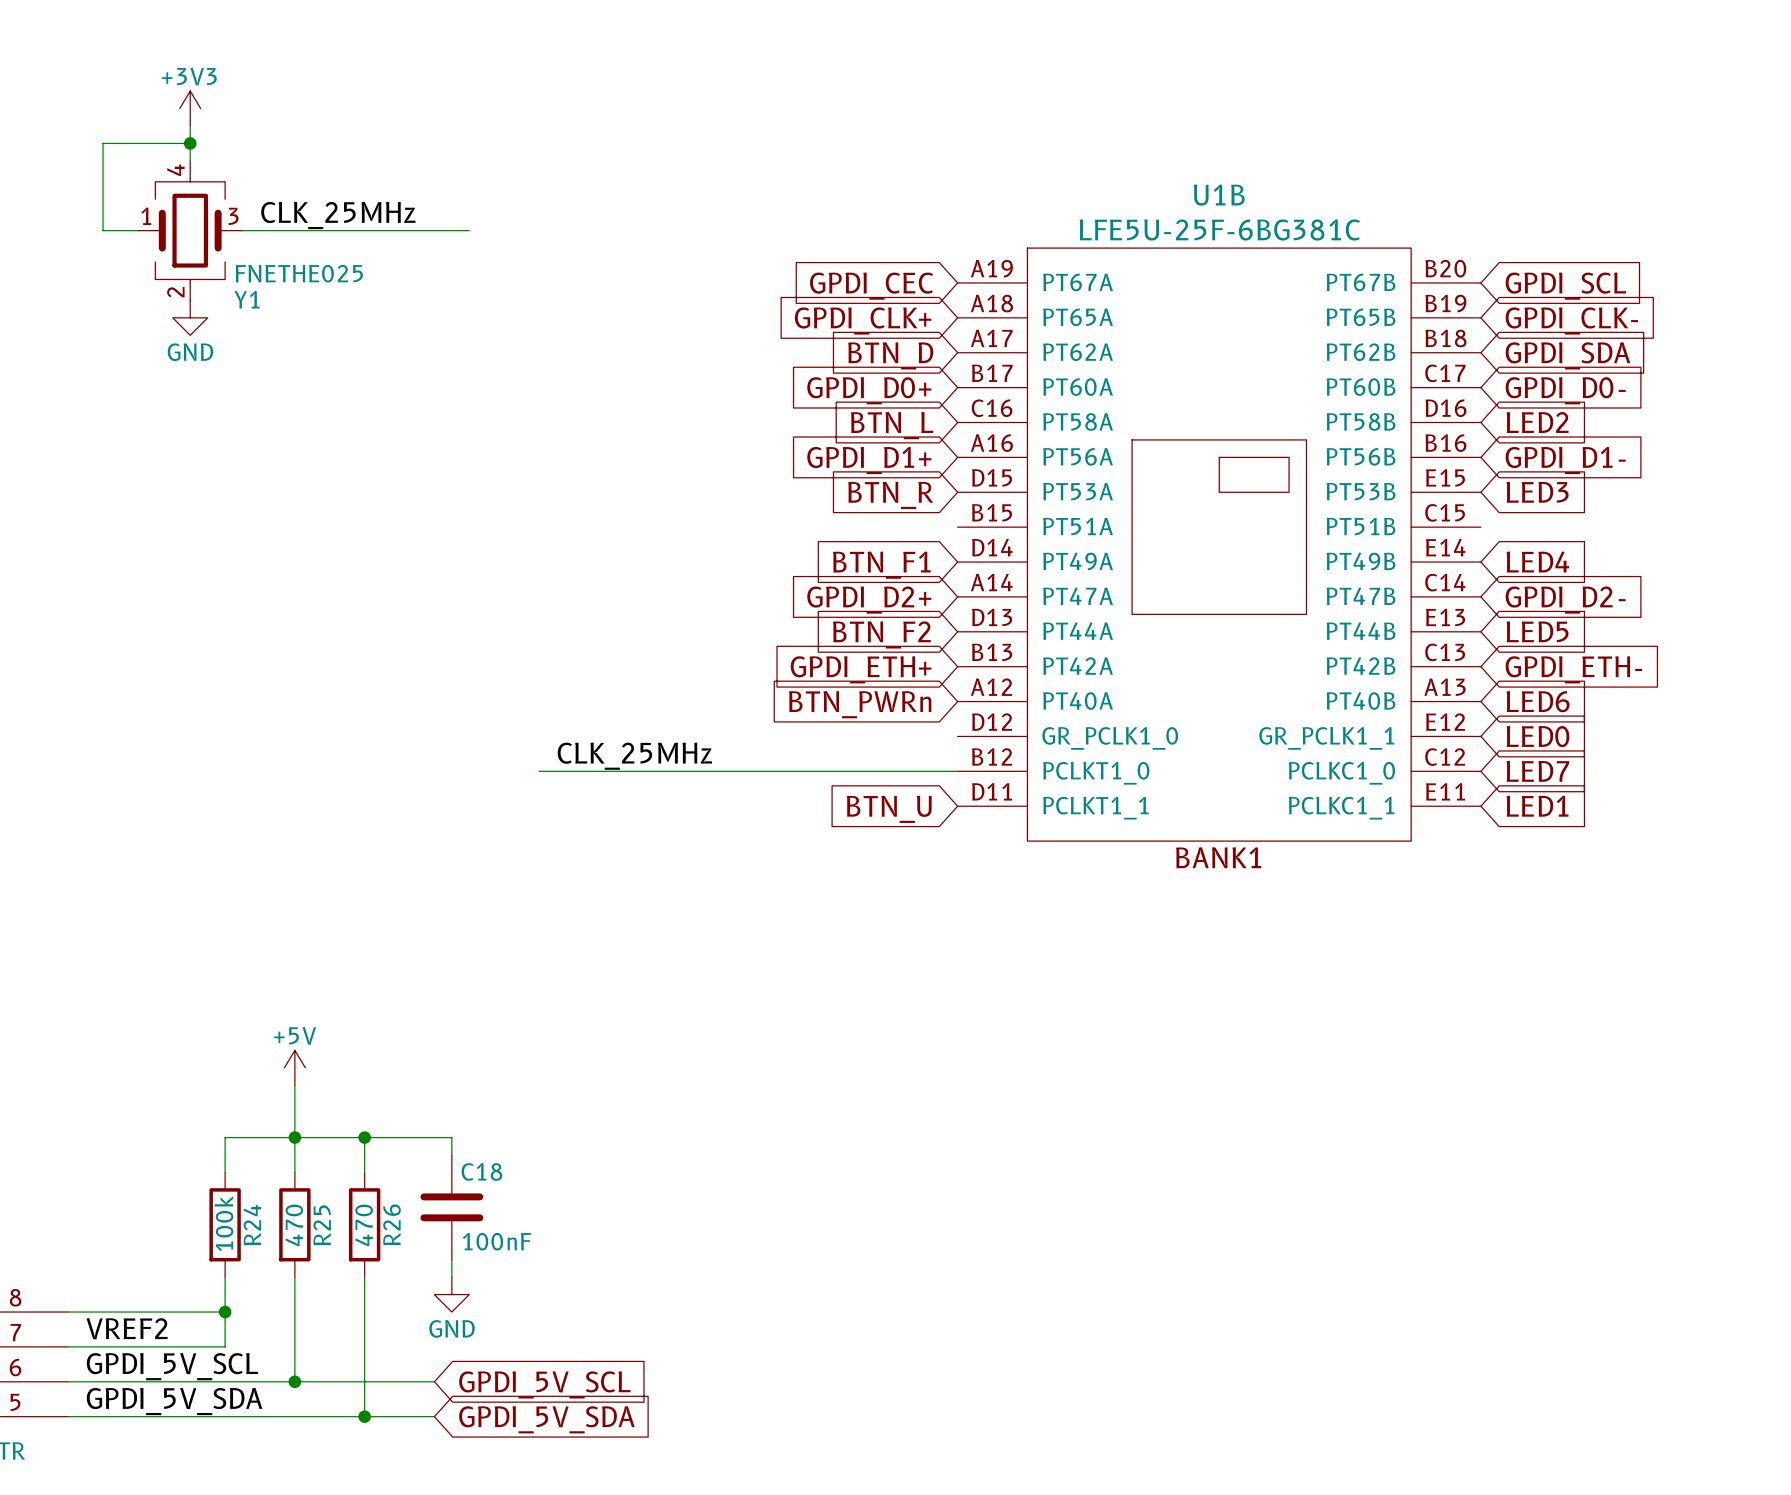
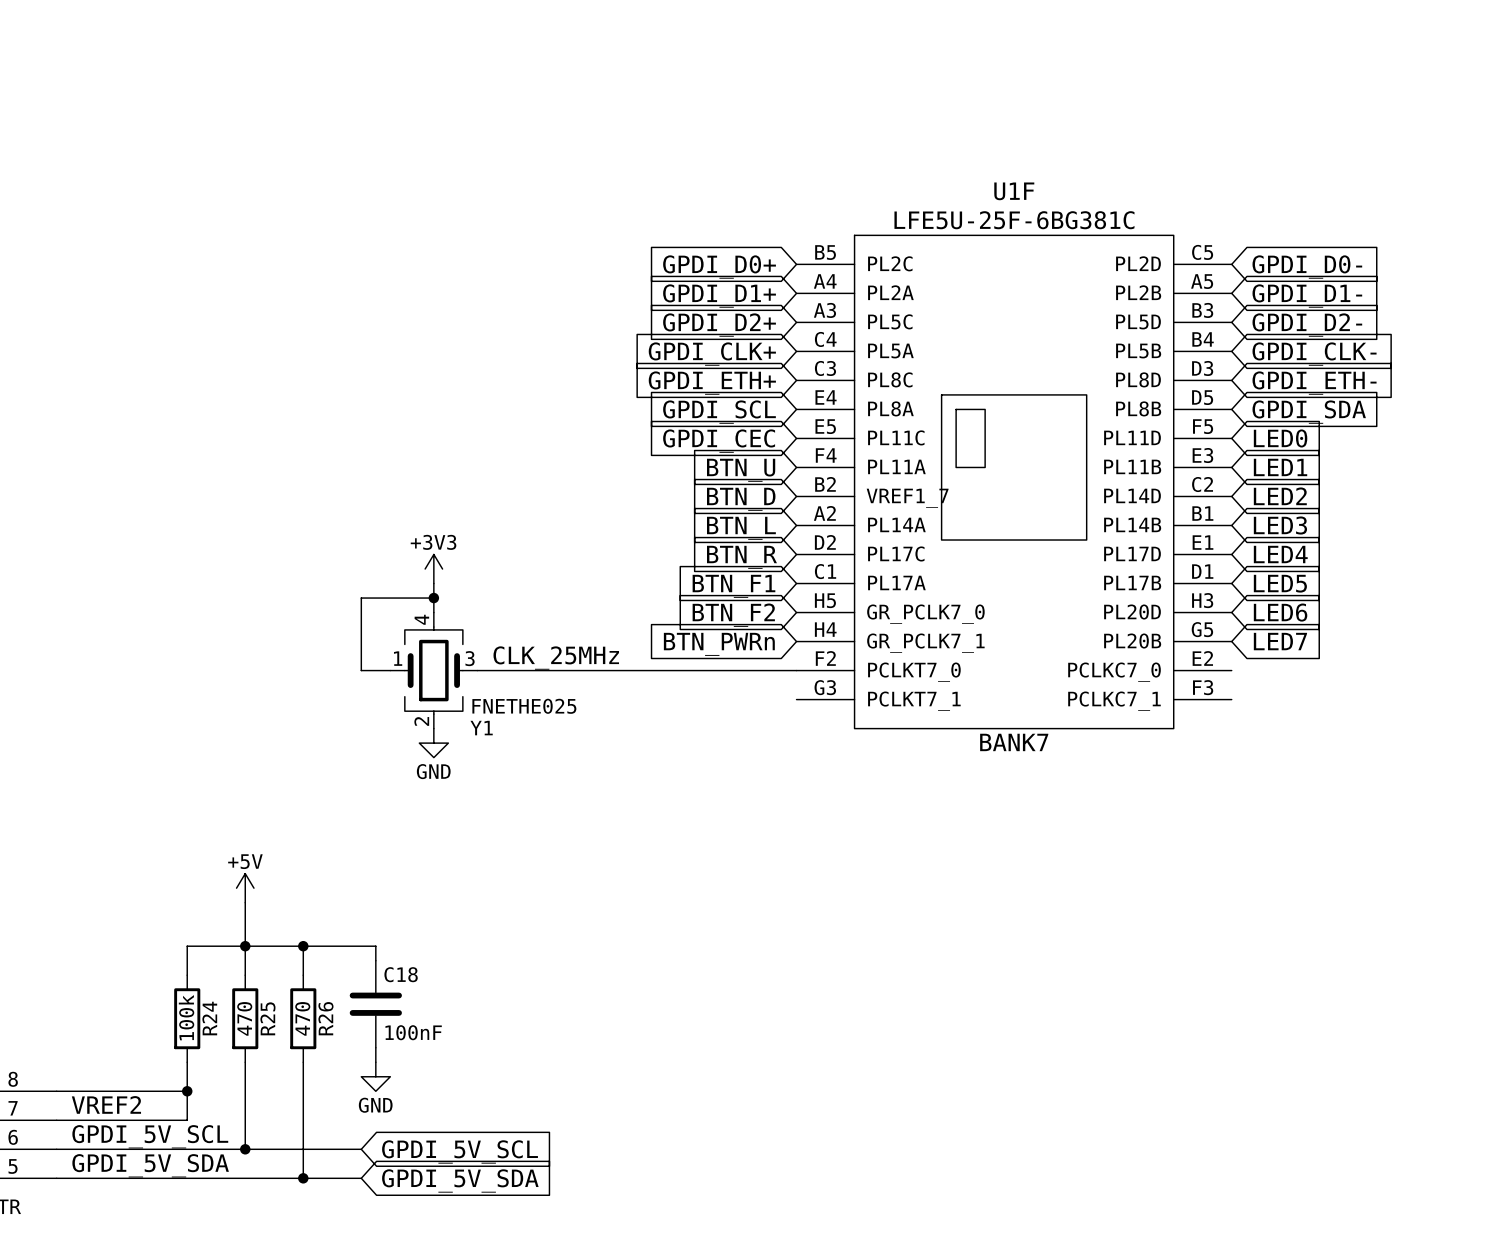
power symbol: +3V3 (190, 108) -> none
wire: (190, 125) (190, 160) -> none
wire: (190, 143) (103, 143) (103, 230) (137, 230) -> none
junction: (190, 143) -> none
label: CLK_25MHz (338, 215) -> none
Y1 position: (190, 230) -> (433, 670)
wire: (242, 230) (469, 230) -> none
global label position: GPDI_CEC (871, 286) -> GPDI_CEC (719, 441)
global label: GPDI_SCL (1565, 286) -> none
power symbol: GND (190, 317) -> none
global label: GPDI_CLK+ (863, 320) -> GPDI_D0+ (719, 267)
global label: GPDI_CLK- (1571, 320) -> GPDI_D0- (1307, 267)
global label: BTN_D (890, 355) -> GPDI_D1+ (719, 296)
global label: GPDI_SDA (1567, 355) -> GPDI_D1- (1307, 296)
global label: GPDI_D0+ (869, 390) -> GPDI_D2+ (719, 325)
global label: GPDI_D0- (1565, 390) -> GPDI_D2- (1307, 325)
global label: LED2 (1537, 422) -> GPDI_CLK- (1314, 354)
global label: BTN_L (892, 425) -> GPDI_CLK+ (712, 354)
global label: GPDI_D1+ (869, 460) -> GPDI_ETH+ (712, 383)
global label: GPDI_D1- (1565, 460) -> GPDI_ETH- (1314, 383)
global label: LED3 (1537, 492) -> GPDI_SDA (1309, 412)
global label: BTN_R (890, 495) -> GPDI_SCL (719, 412)
global label: none -> LED0 (1280, 438)
U1B: LFE5U-25F-6BG381C (1219, 544) -> none
global label: LED4 (1537, 562) -> LED1 (1280, 467)
global label: BTN_F1 (881, 565) -> BTN_U (741, 470)
U1F: none -> LFE5U-25F-6BG381C (1014, 481)
global label: GPDI_D2+ (869, 600) -> BTN_D (741, 499)
global label: GPDI_D2- (1565, 600) -> LED2 (1280, 496)
global label: LED5 (1537, 631) -> LED3 (1280, 525)
global label: BTN_F2 (881, 634) -> BTN_L (741, 528)
global label: GPDI_ETH+ (861, 669) -> BTN_R (741, 557)
global label: GPDI_ETH- (1573, 669) -> LED4 (1280, 554)
power symbol: none -> +3V3 (433, 569)
wire: none -> (433, 583) (433, 612)
global label: LED6 (1538, 701) -> LED5 (1280, 583)
global label: BTN_PWRn (860, 704) -> BTN_F1 (733, 586)
wire: none -> (433, 598) (361, 598) (361, 670) (390, 670)
junction: none -> (433, 598)
global label: LED0 (1537, 736) -> LED6 (1280, 612)
global label: none -> BTN_F2 (733, 615)
label position: CLK_25MHz (634, 756) -> CLK_25MHz (556, 658)
wire: (539, 771) (957, 771) -> none
wire: none -> (477, 670) (796, 670)
global label: LED1 (1537, 806) -> none
global label: BTN_U (889, 809) -> BTN_PWRn (719, 644)
power symbol: none -> GND (433, 743)

